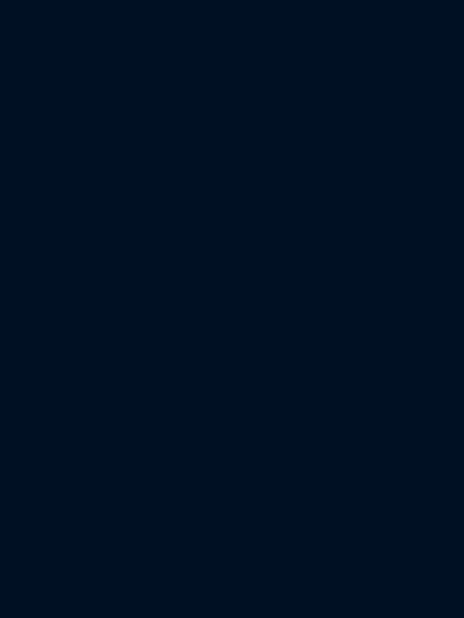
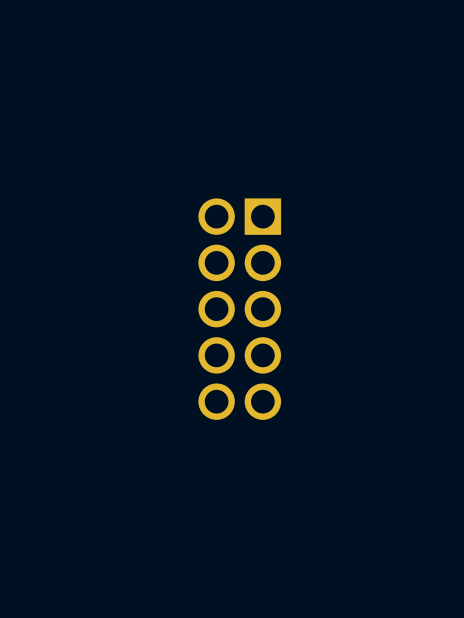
part: none -> (239, 309)

